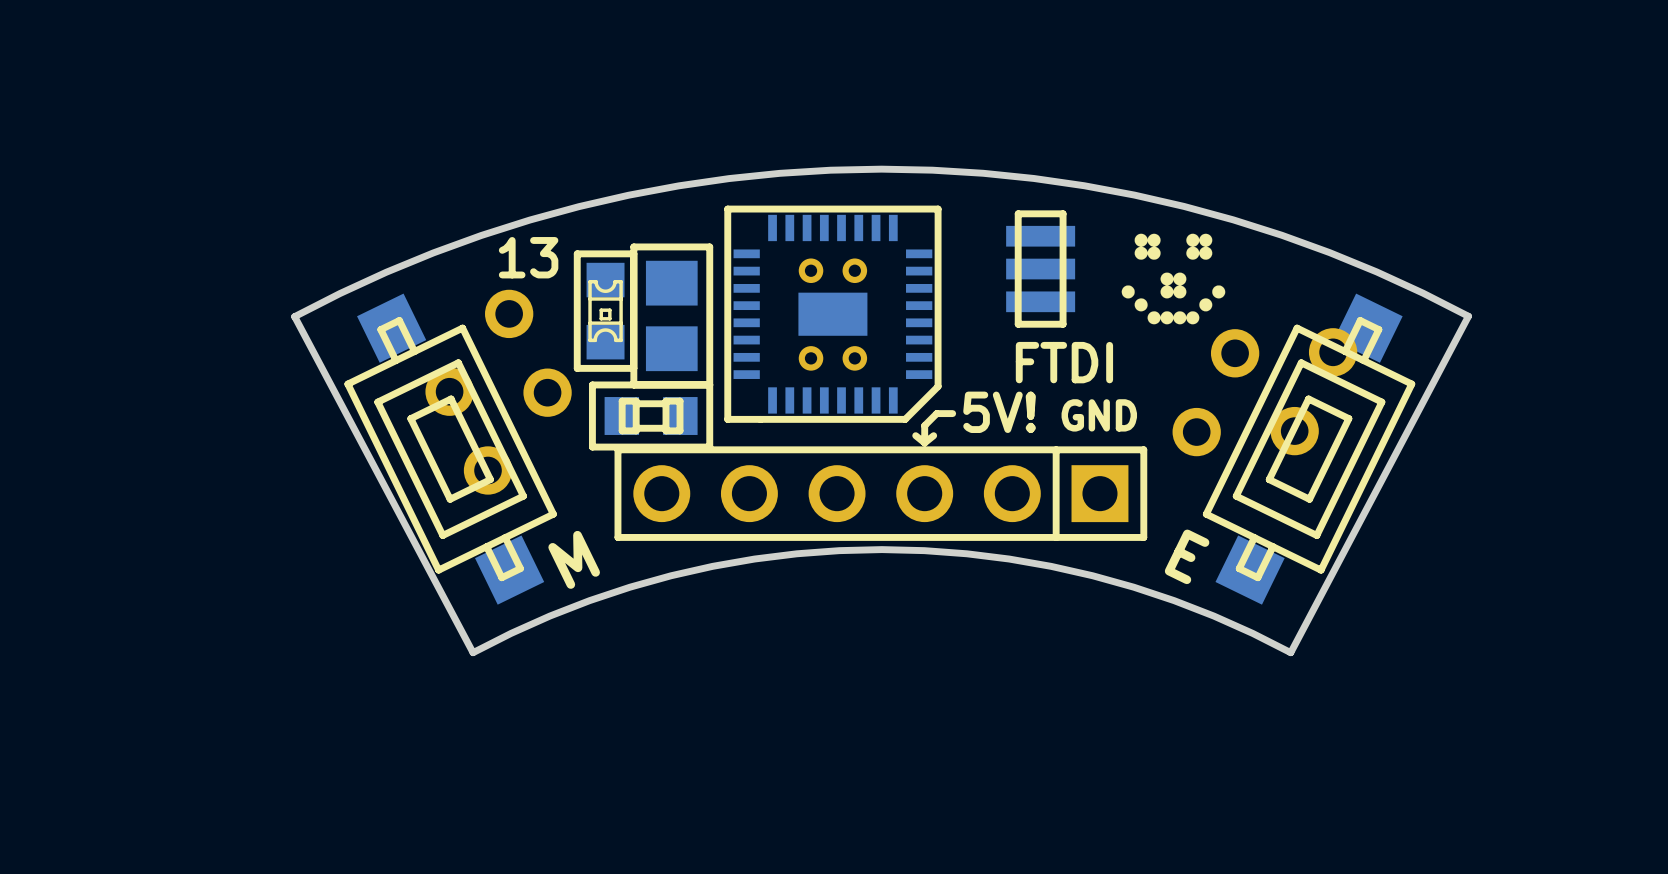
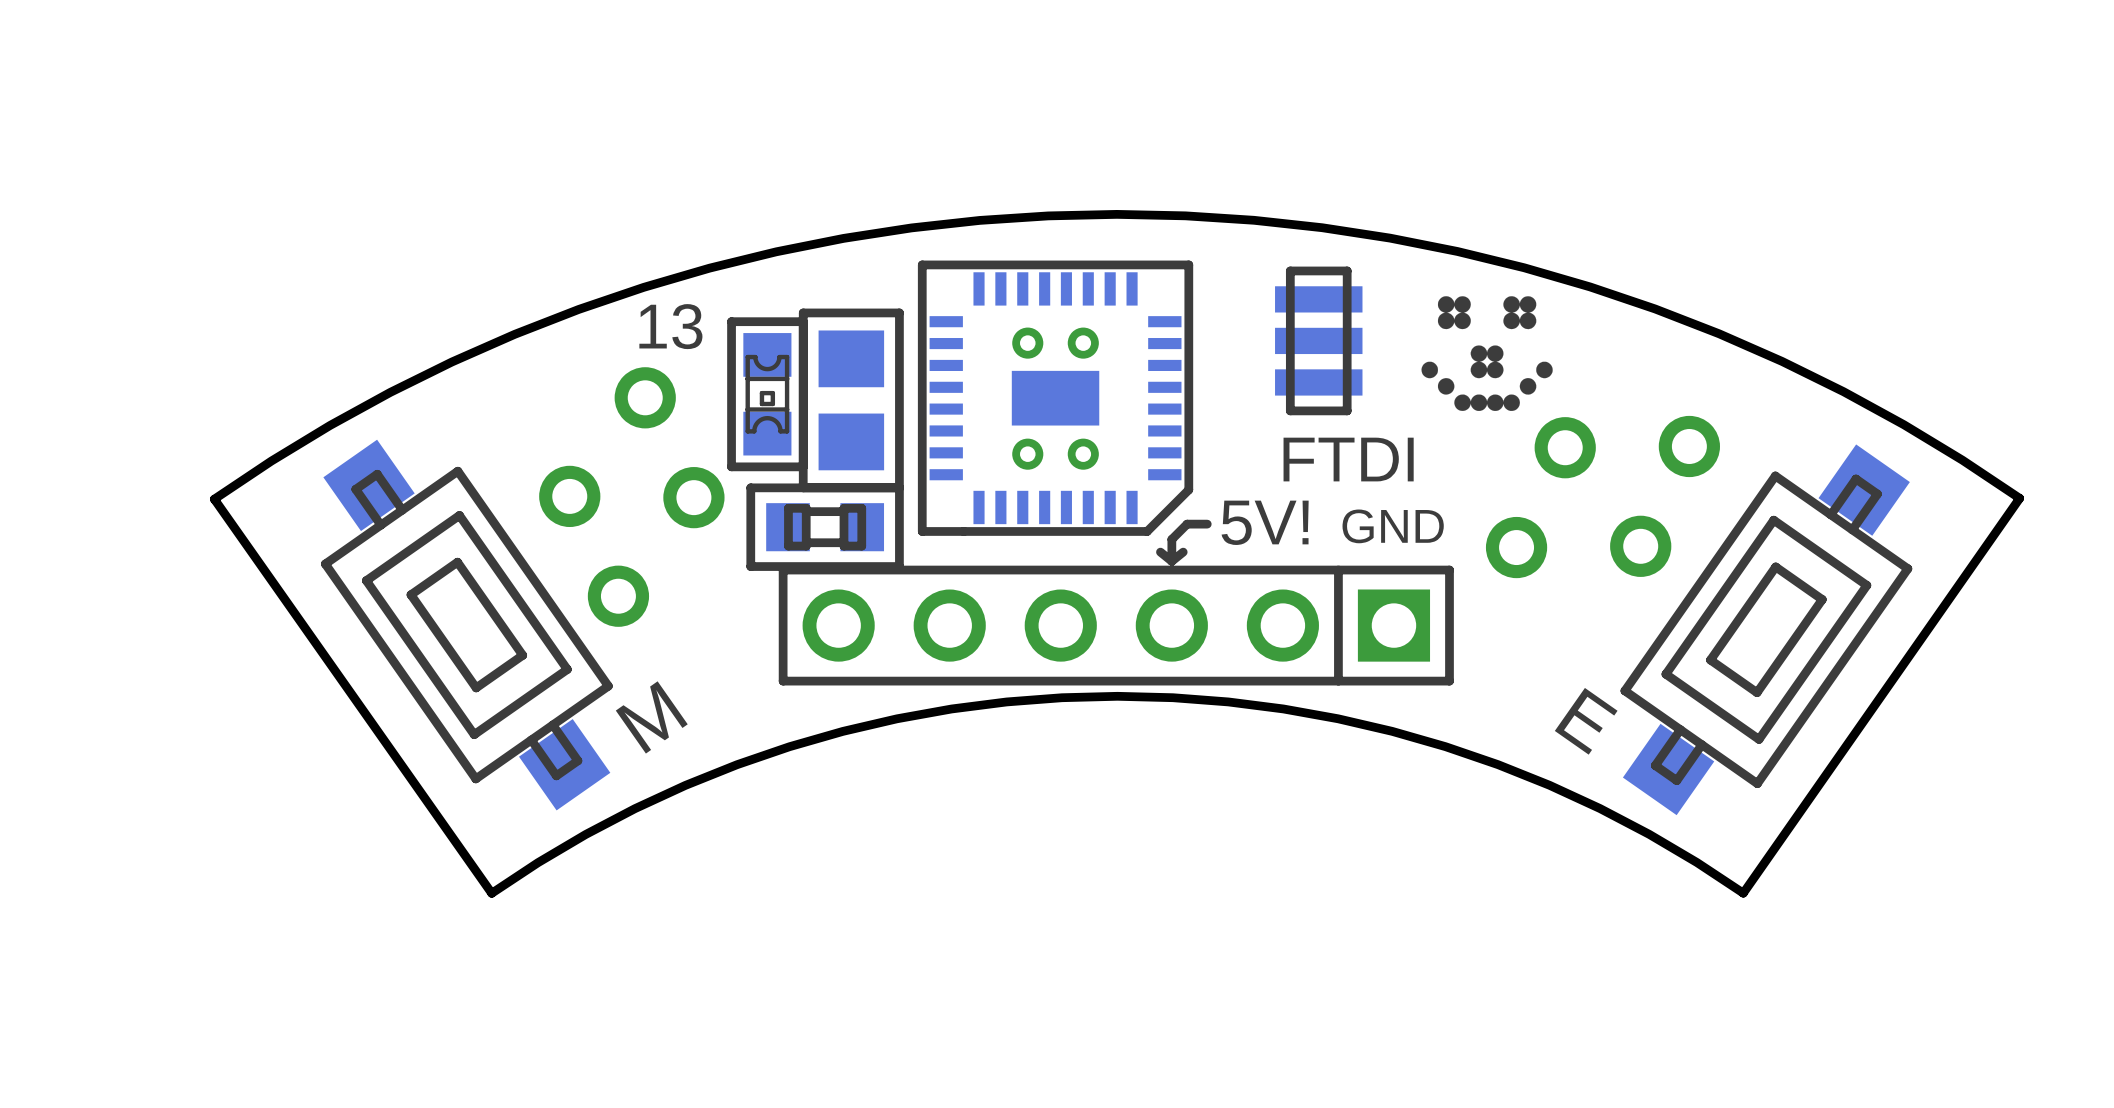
board edge: (1468, 316) (1290, 652) (1213, 616) (1133, 587) (1092, 575) (1009, 559) (924, 550) (881, 549) (796, 553) (754, 559) (671, 575) (630, 587) (549, 616) (473, 652) (294, 316) (386, 272) (433, 252) (529, 220) (578, 206) (678, 185) (729, 178) (779, 173) (881, 169) (932, 170) (1033, 178) (1134, 195) (1184, 206) (1233, 219) (1329, 252) (1376, 271) (1468, 316) -> (2019, 498) (1903, 424) (1782, 361) (1655, 308) (1590, 286) (1457, 251) (1322, 227) (1254, 220) (1116, 214) (979, 220) (911, 227) (776, 251) (643, 287) (514, 334) (451, 362) (330, 425) (214, 499) (491, 893) (538, 862) (635, 808) (736, 764) (789, 746) (842, 731) (951, 708) (1006, 701) (1117, 696) (1228, 701) (1283, 708) (1338, 718) (1445, 746) (1549, 785) (1600, 808) (1697, 862) (1743, 893) (2019, 498)
part: (450, 449) -> none
part: (1309, 449) -> none
part: none -> (466, 625)
part: none -> (1766, 629)
text rotation: 0° (1187, 556) -> 9° clockwise (1586, 721)
text rotation: 0° (574, 559) -> 9° counterclockwise (651, 717)

